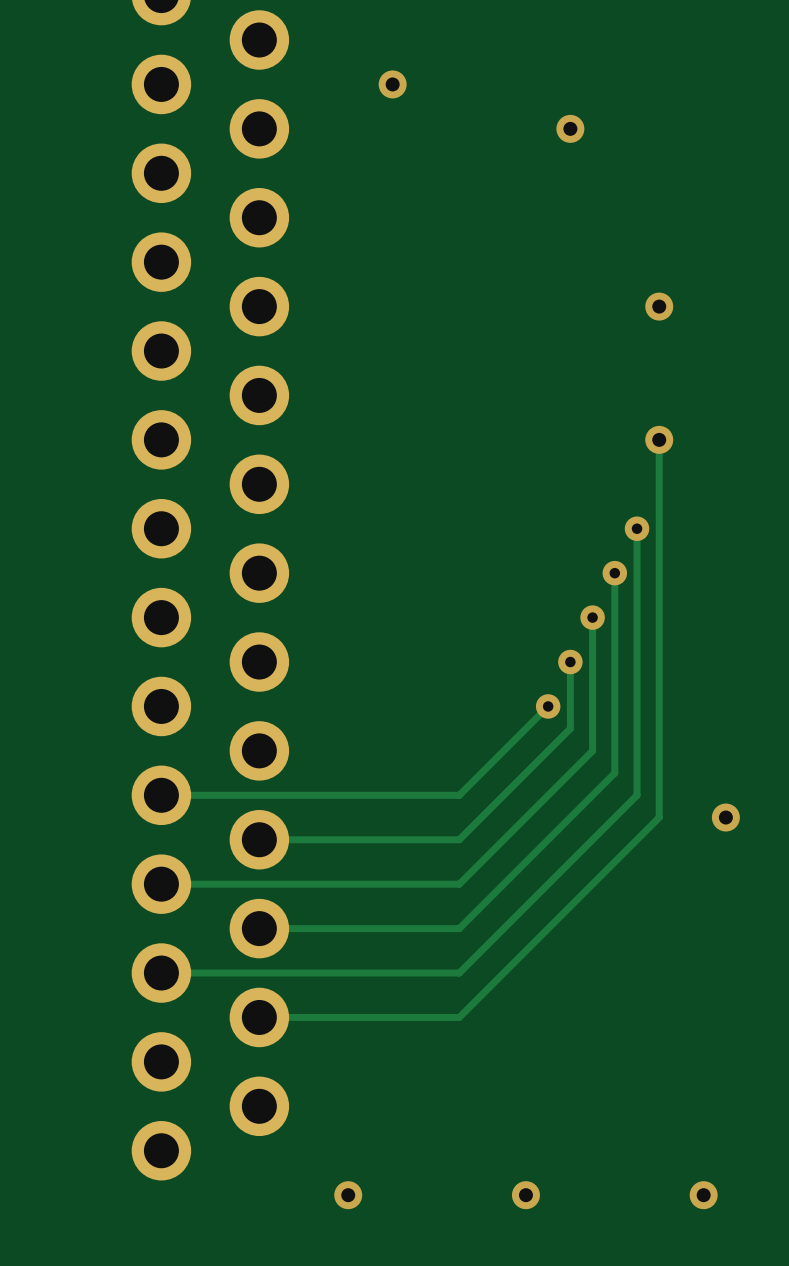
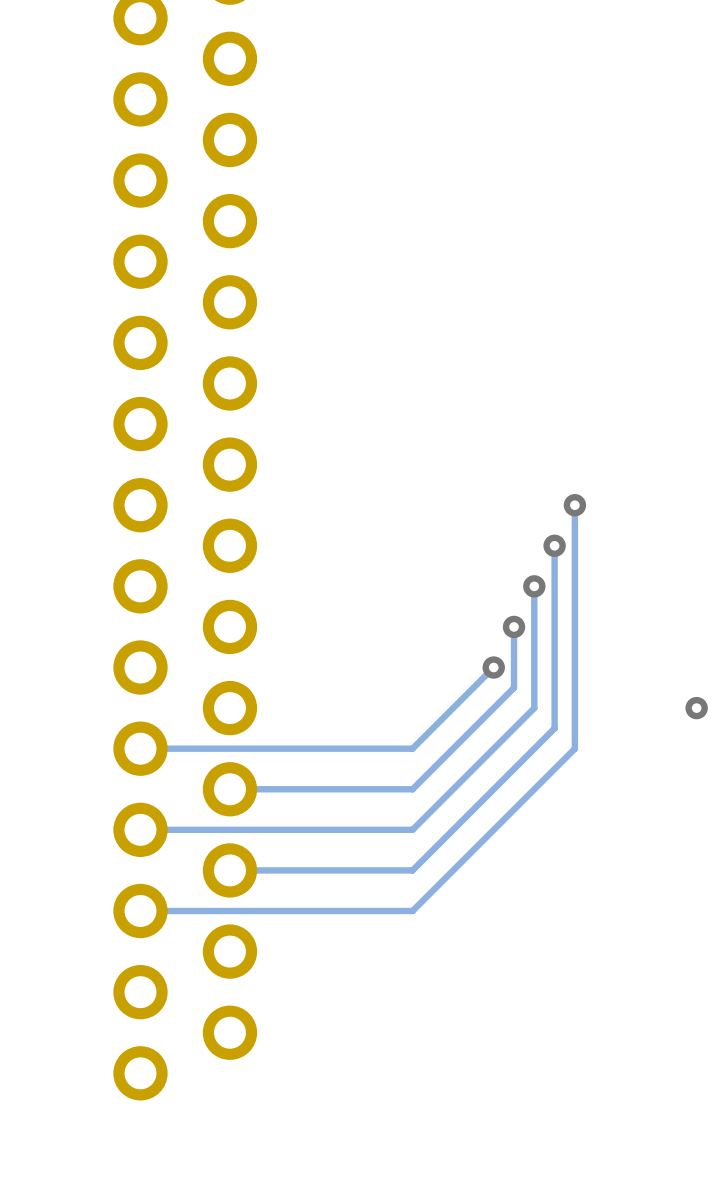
via: (392, 84) -> none
via: (570, 128) -> none
via: (659, 306) -> none
track: (659, 439) (659, 817) (459, 1017) (259, 1017) -> none
via: (659, 439) -> none
via: none -> (696, 708)
via: (725, 817) -> none
via: (348, 1195) -> none
via: (525, 1195) -> none
via: (703, 1195) -> none

